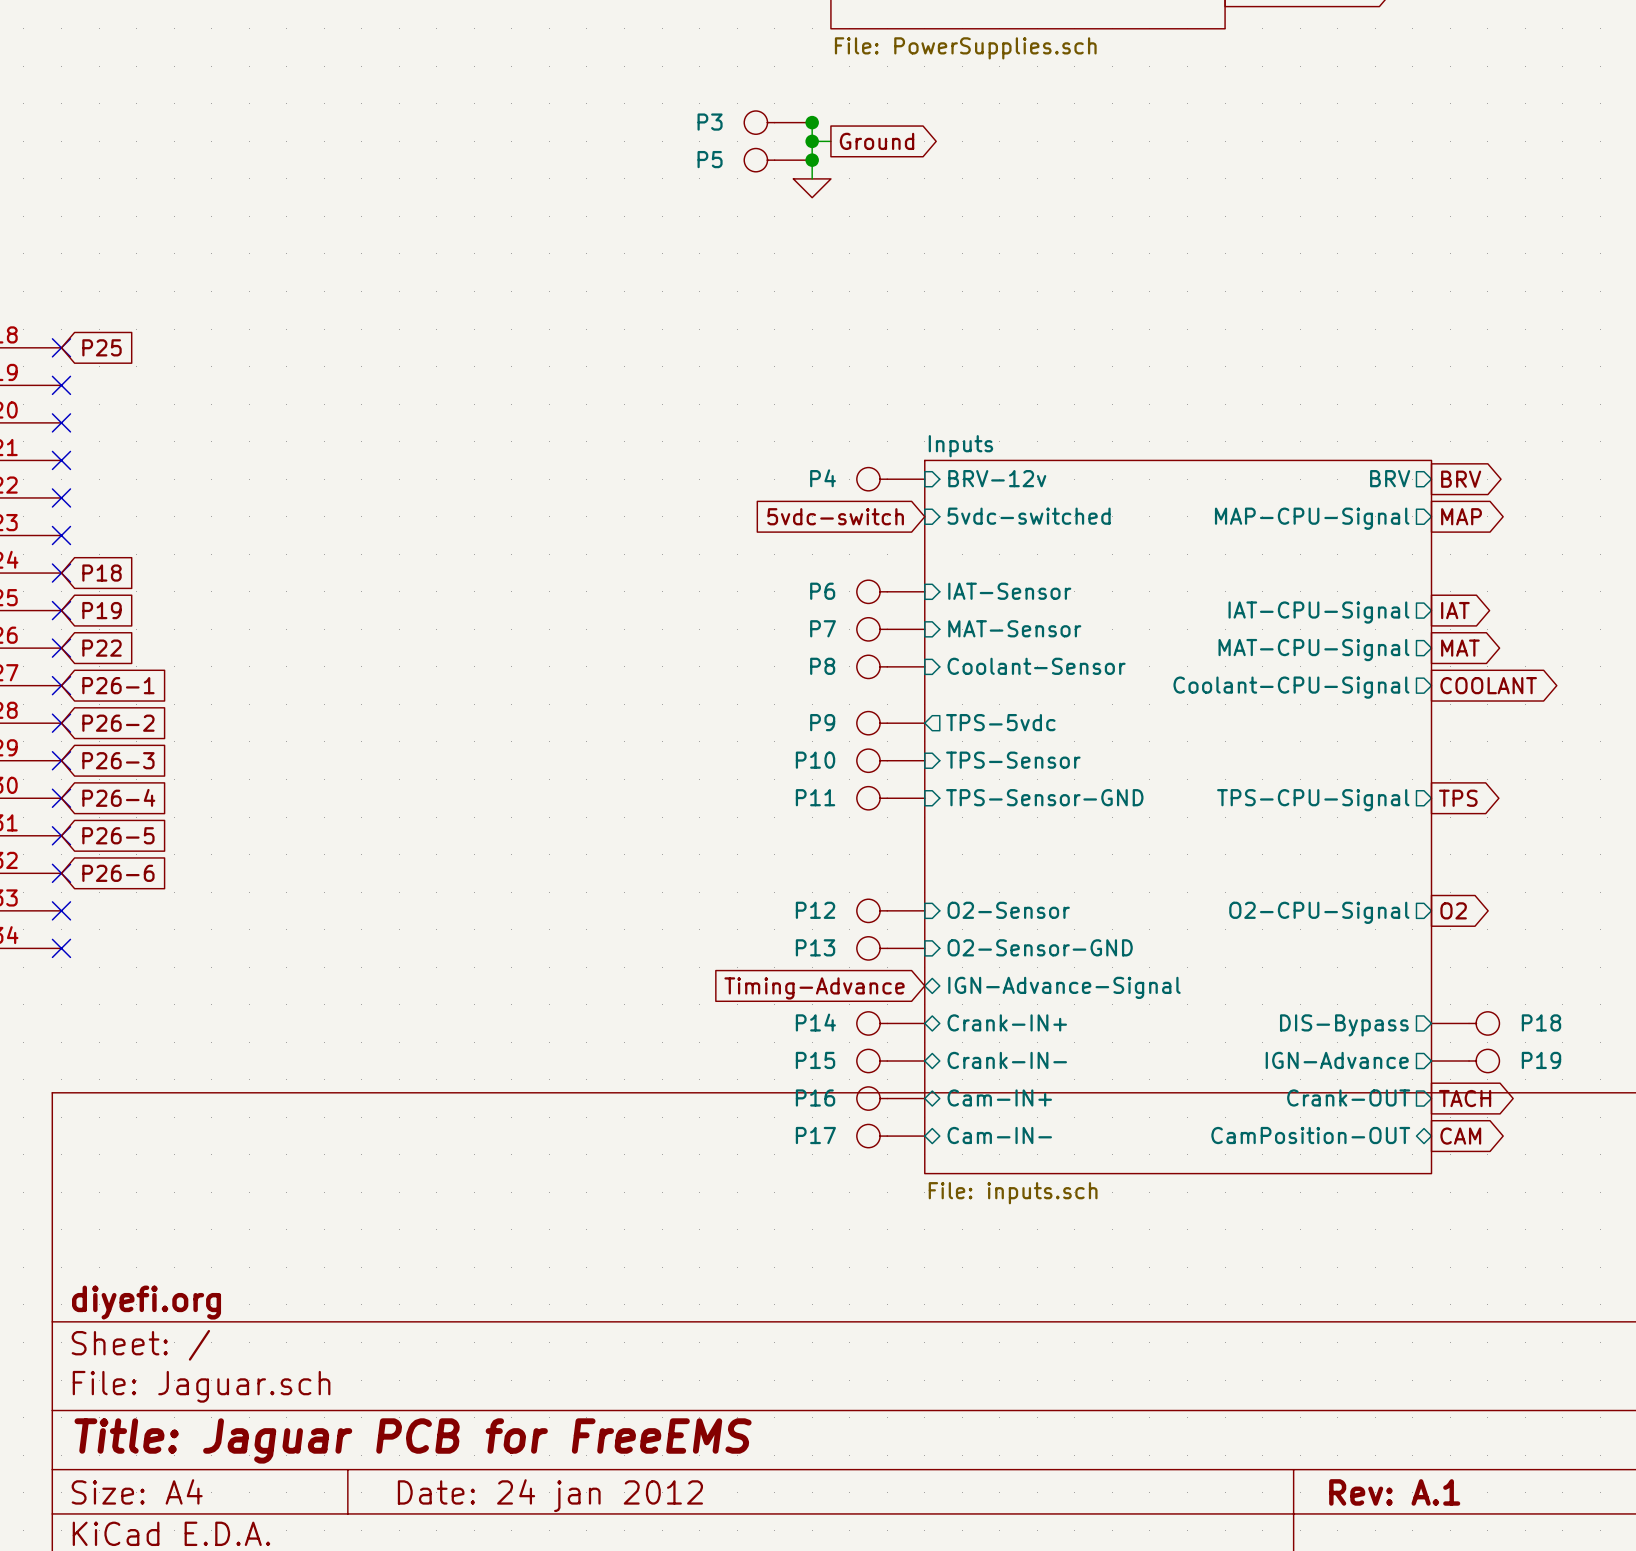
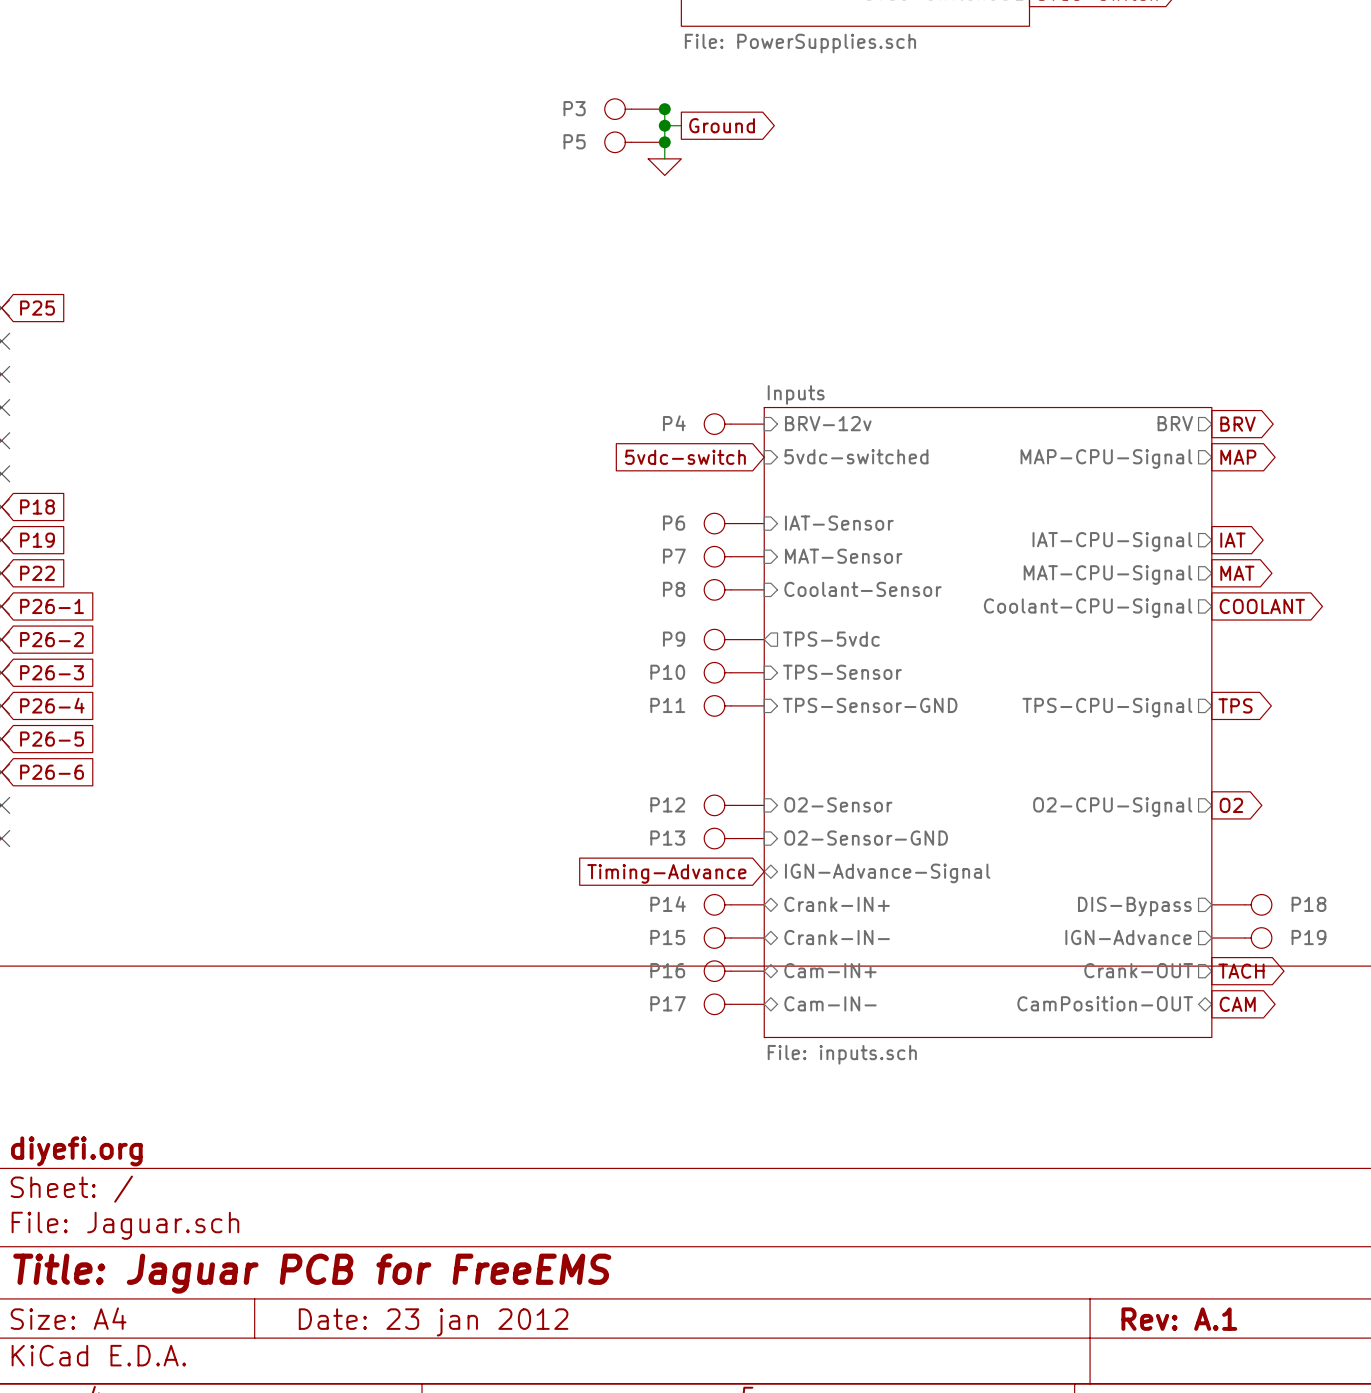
title block: Date: 24 jan 2012 (550, 1495) -> Date: 23 jan 2012 (433, 1322)

